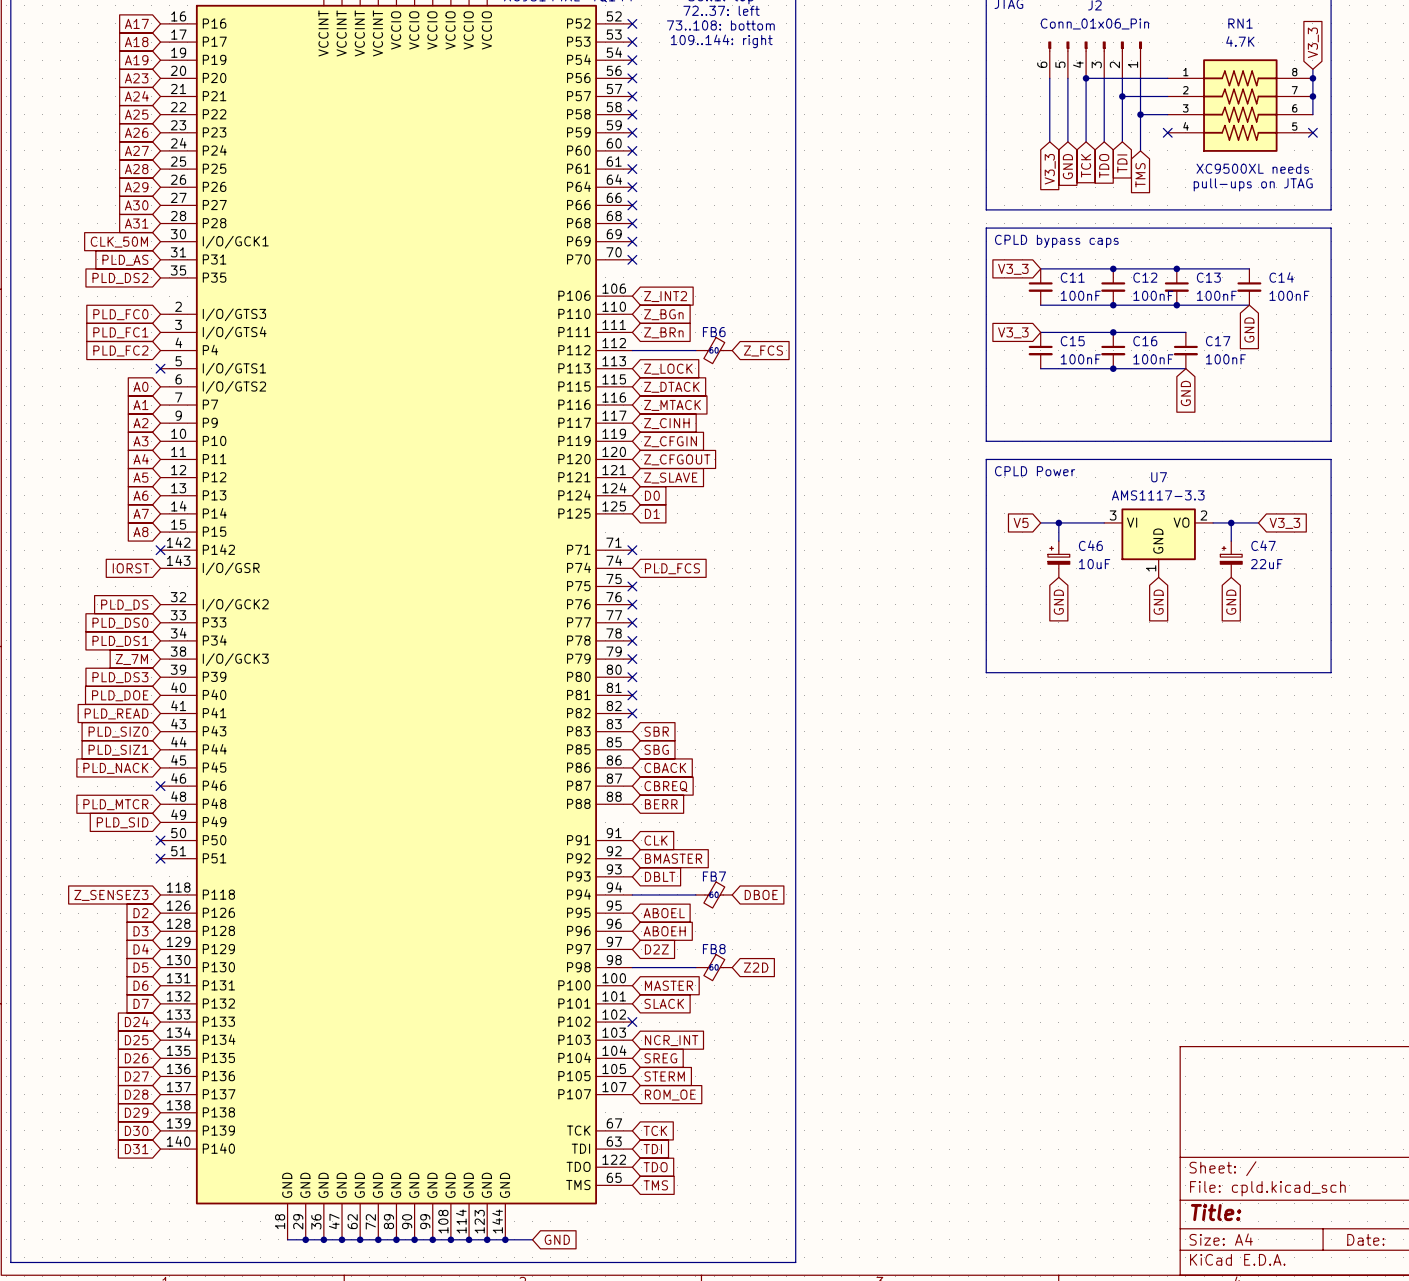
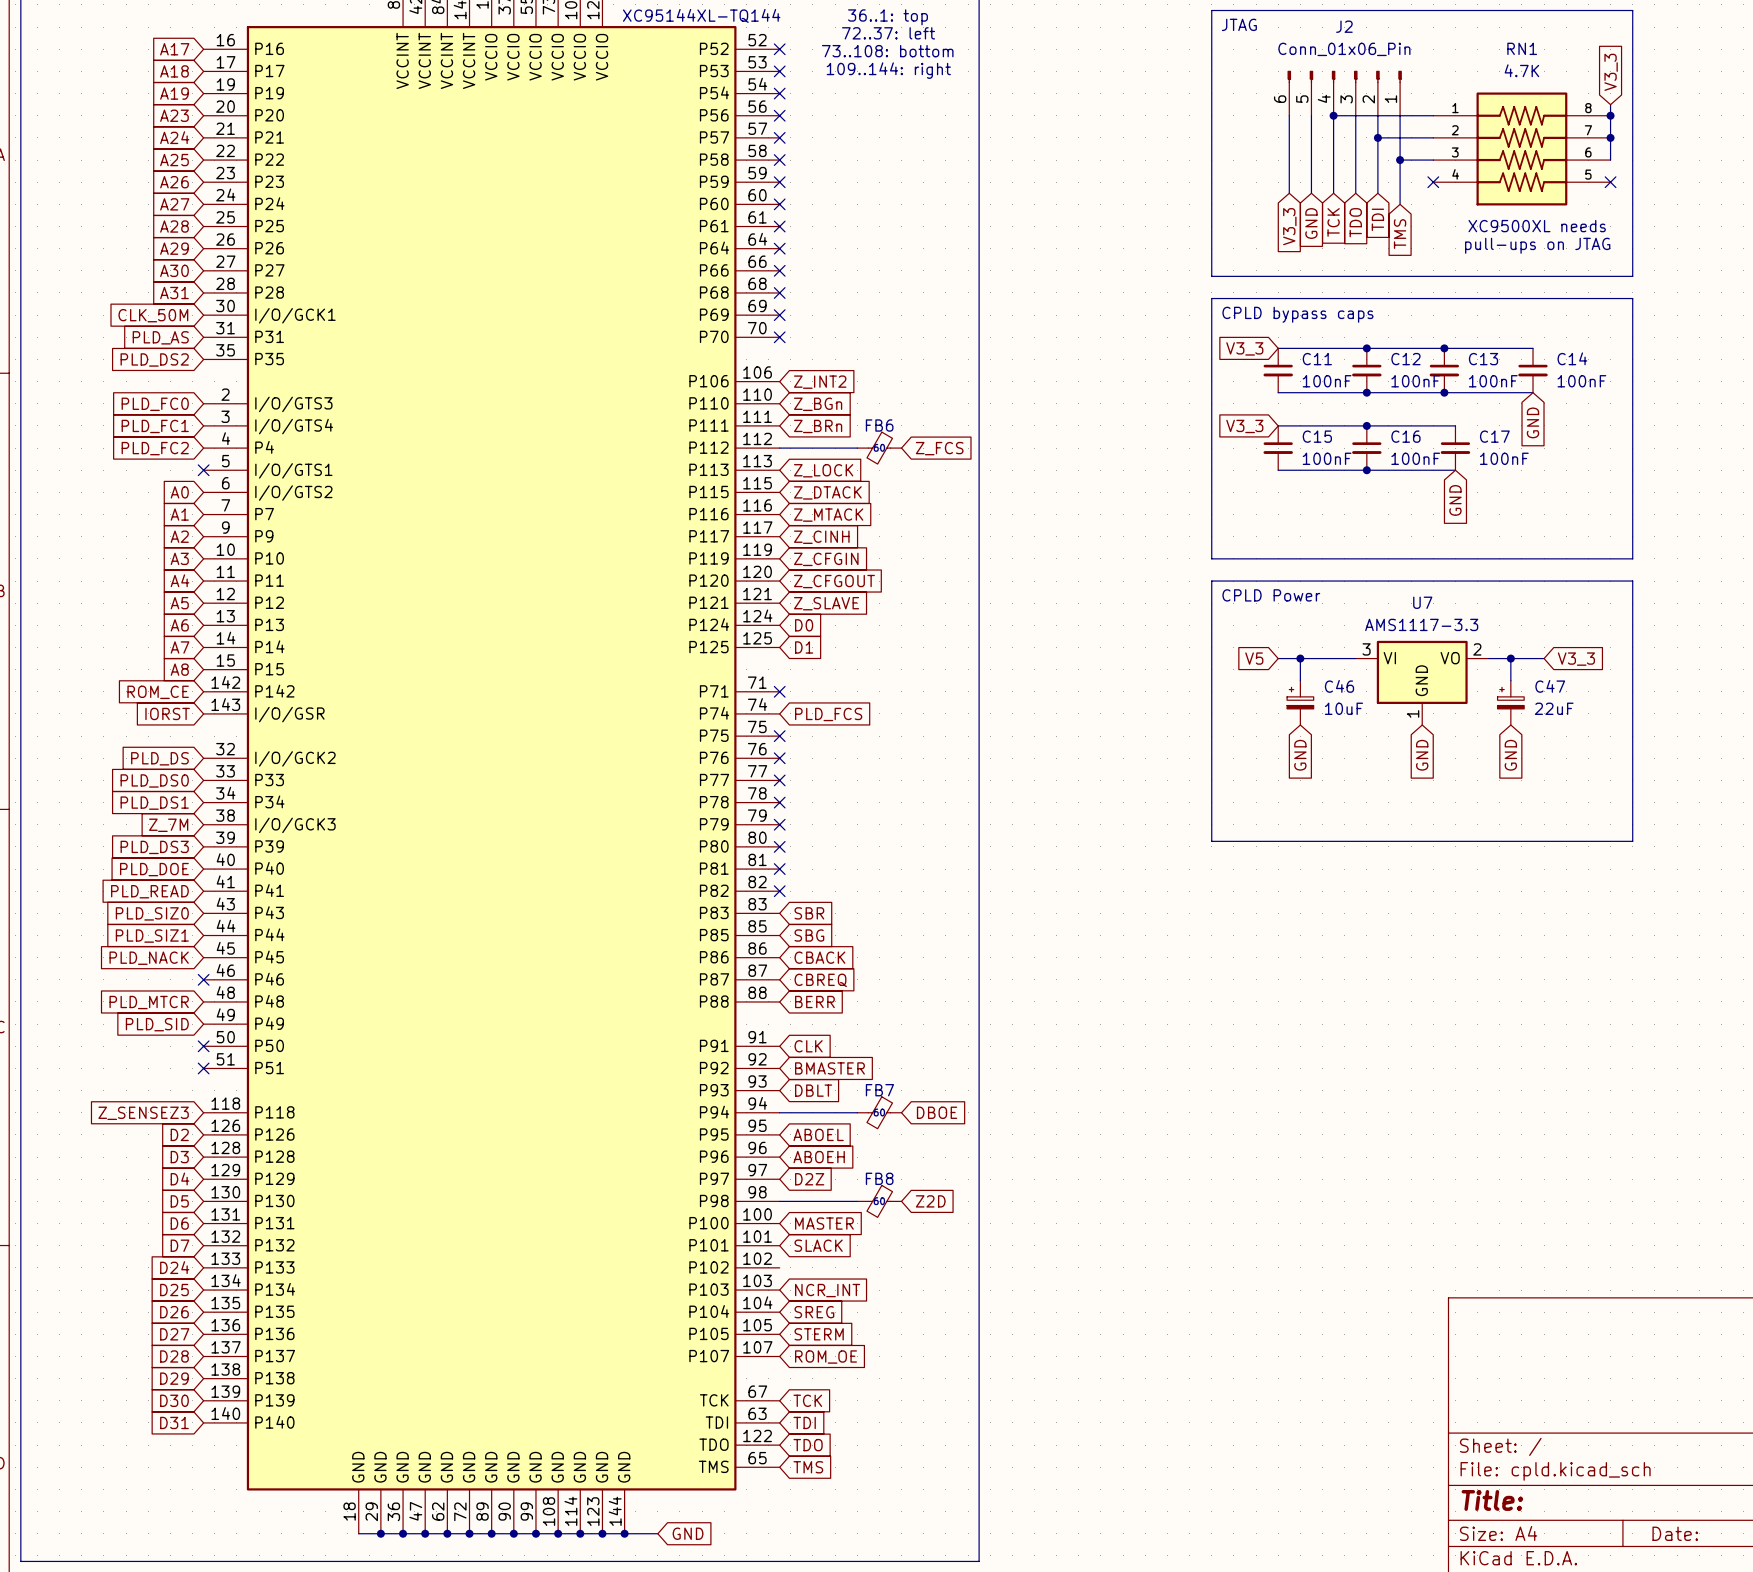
global label: none -> ROM_CE (158, 692)
no-connect mark: (160, 550) -> none
no-connect mark: (632, 1022) -> none

